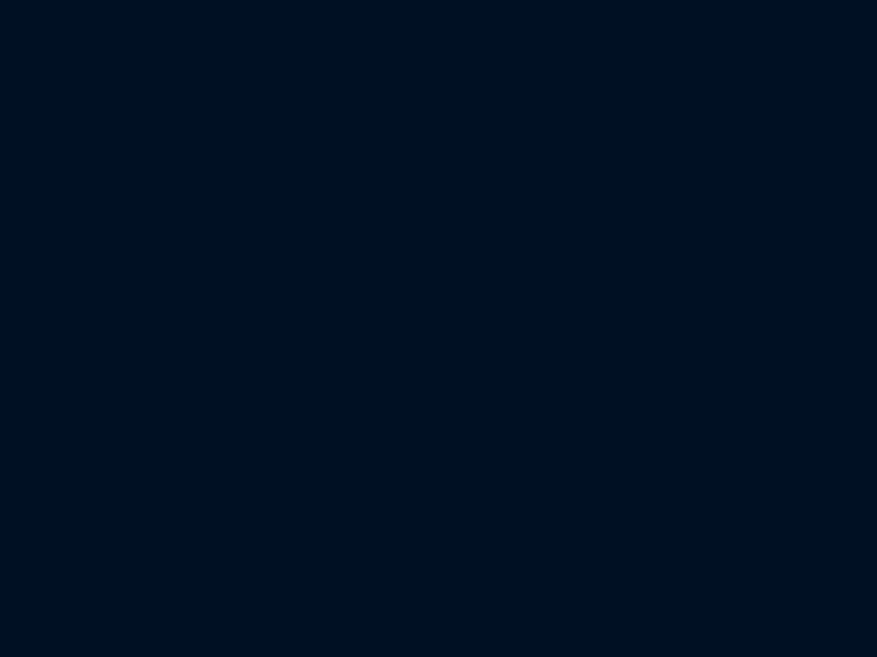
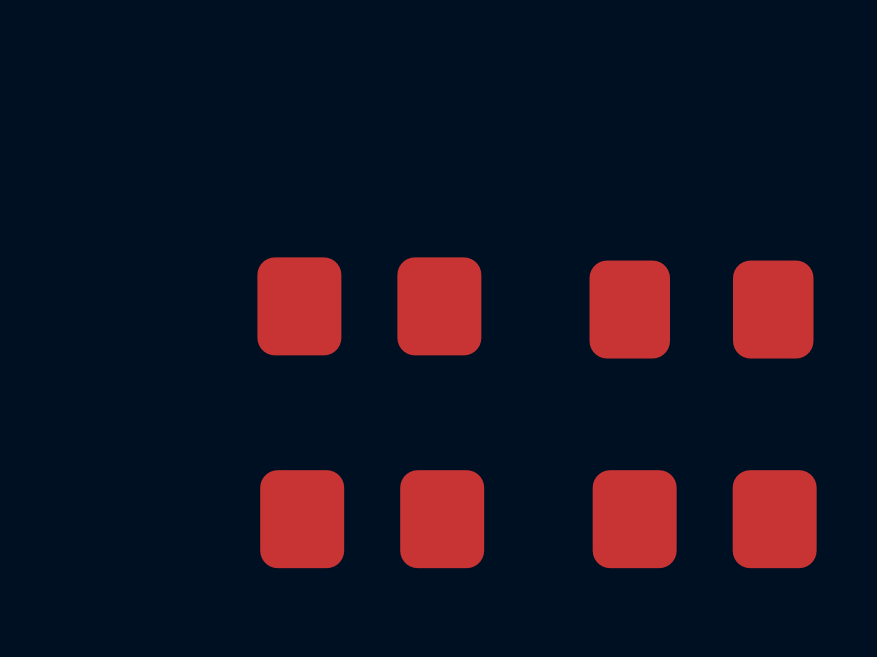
part: none -> (369, 306)
part: none -> (701, 309)
part: none -> (372, 519)
part: none -> (704, 519)

